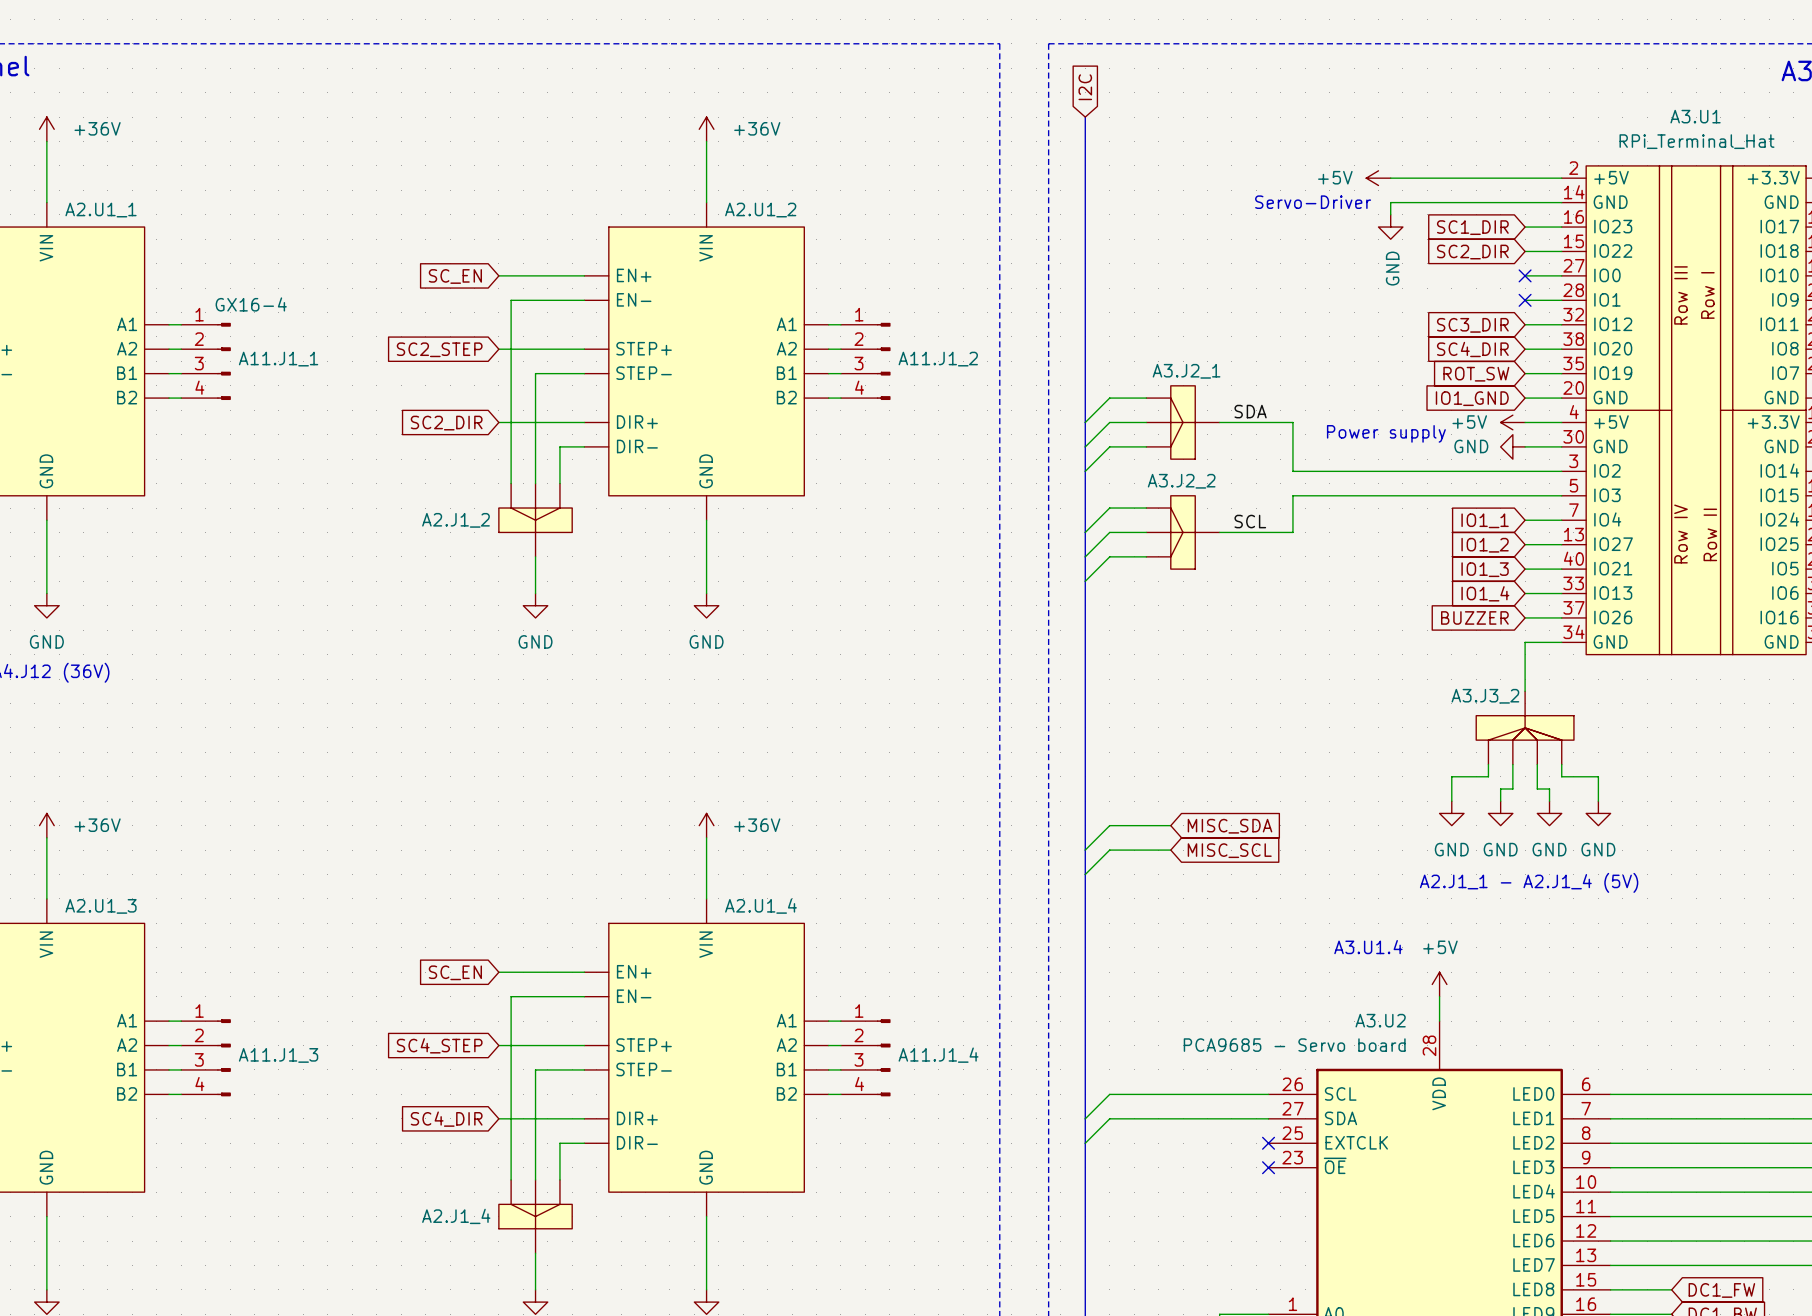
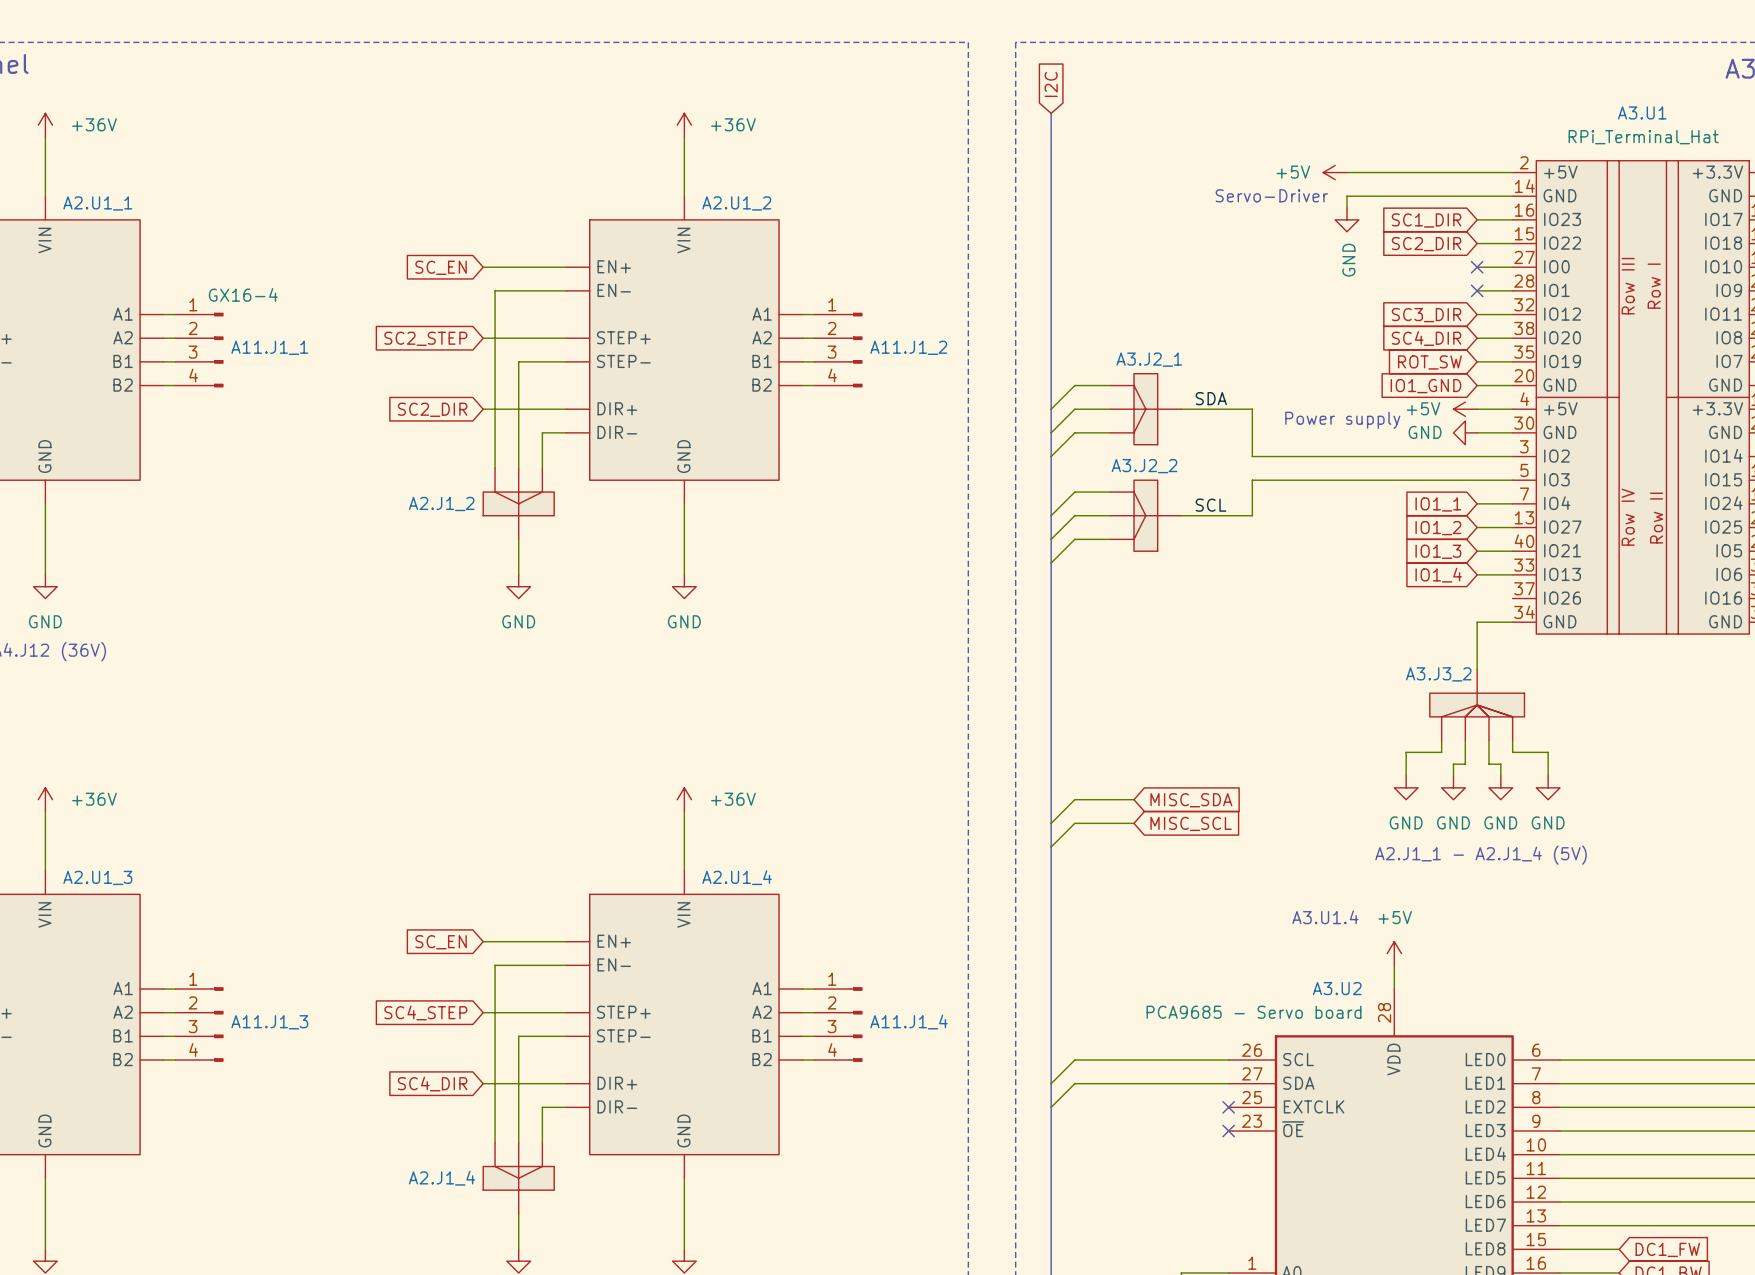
global label: BUZZER (1474, 617) -> none
wire: (1525, 617) (1561, 617) -> none

